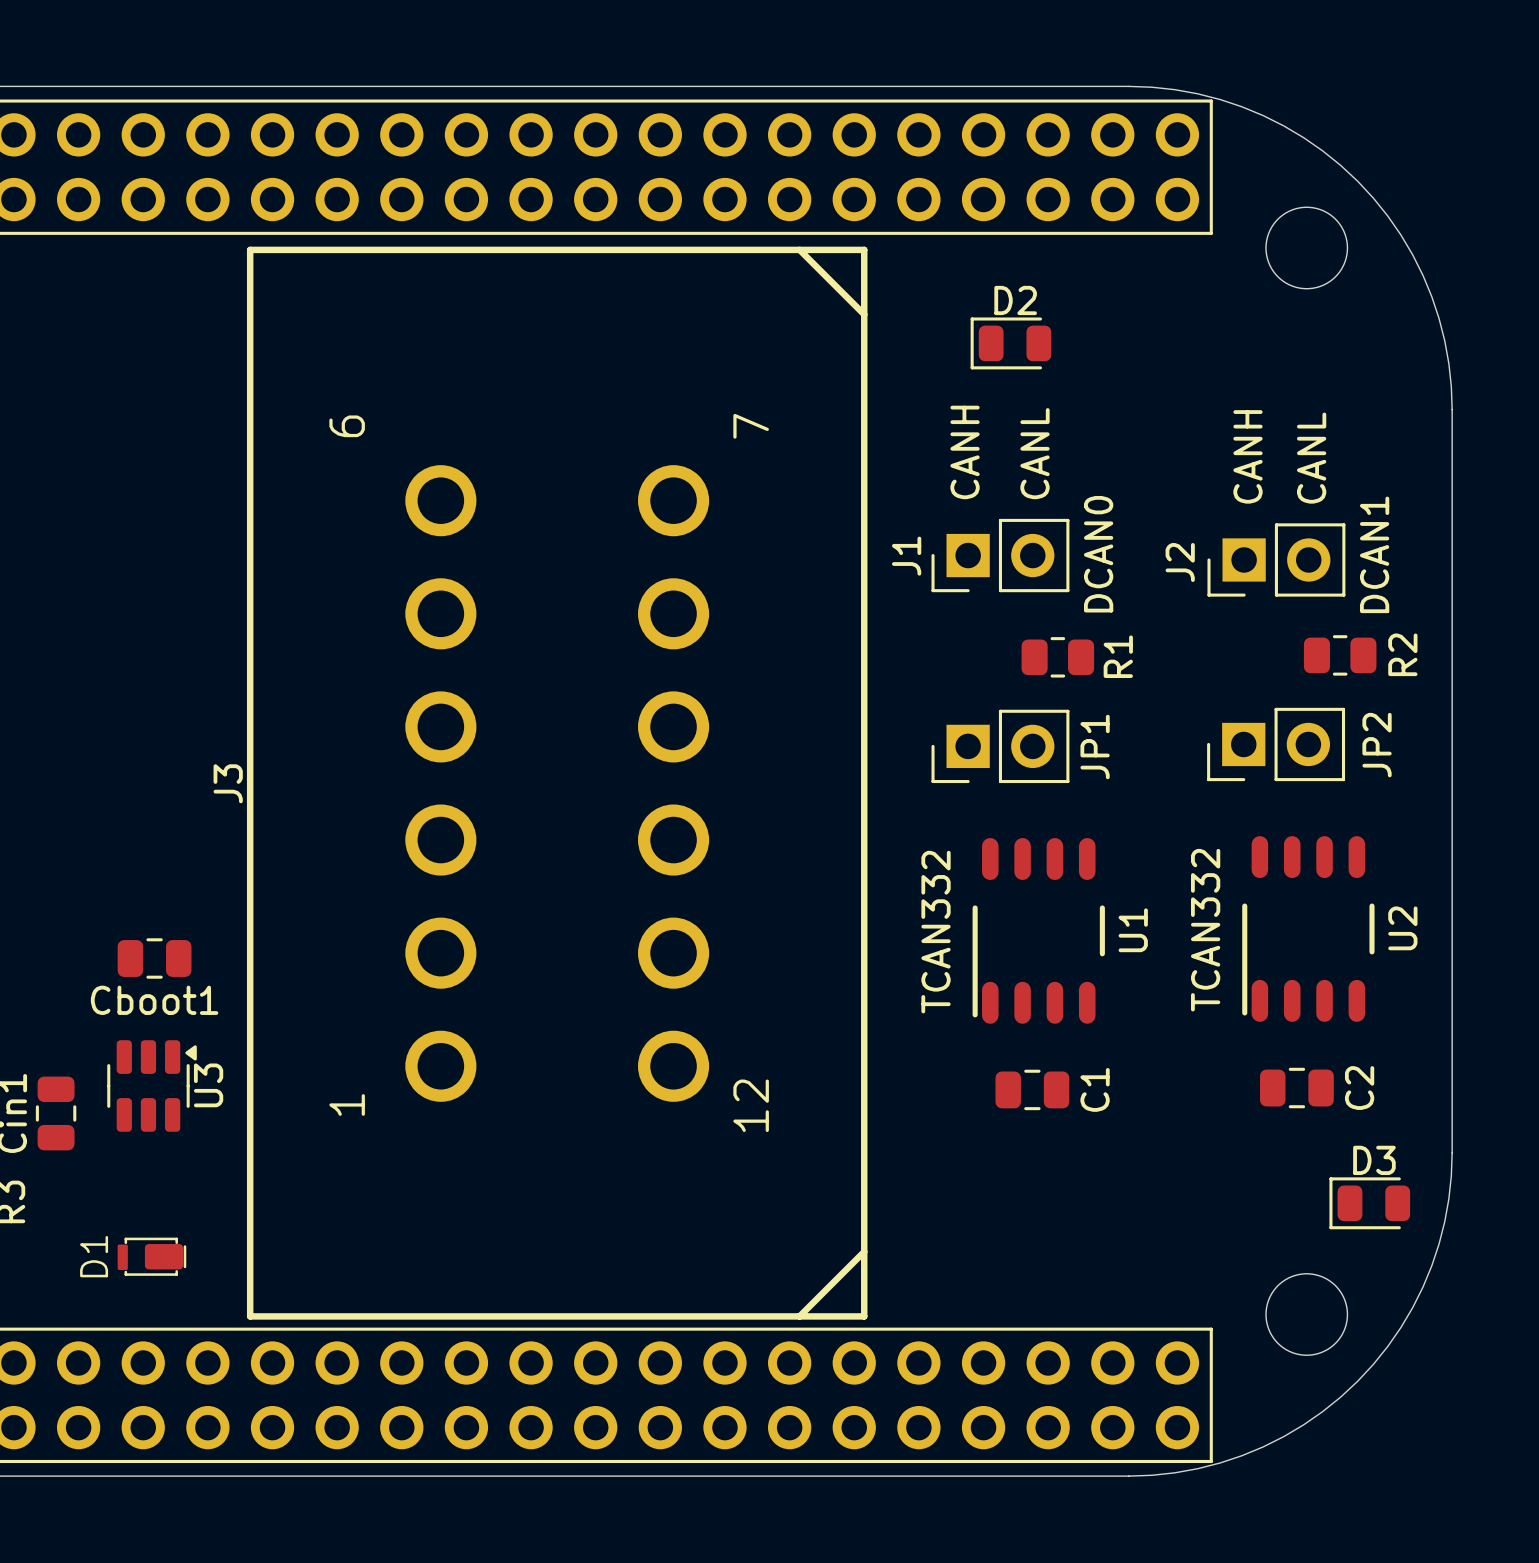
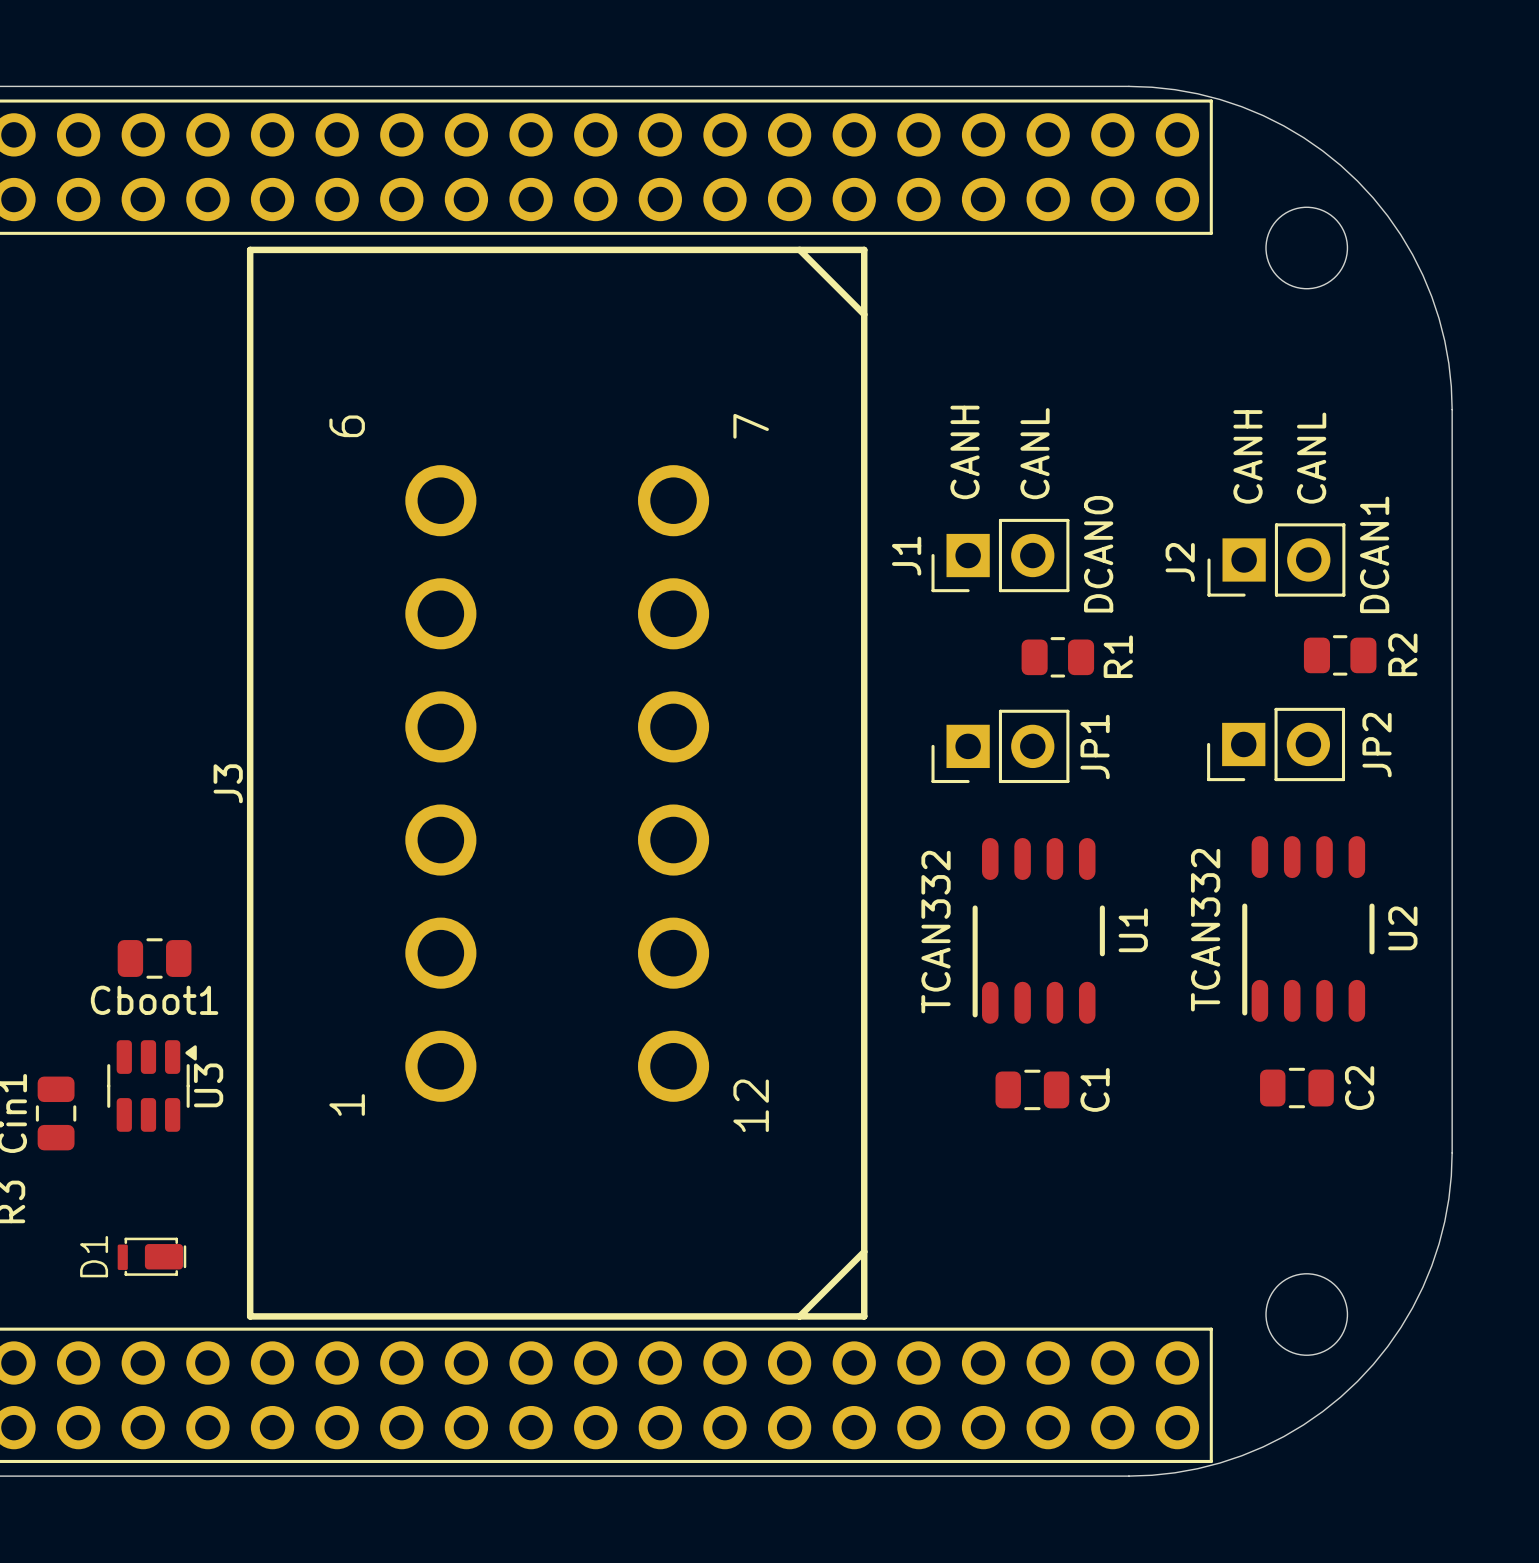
D2: (1010, 343) -> none
D3: (1369, 1203) -> none

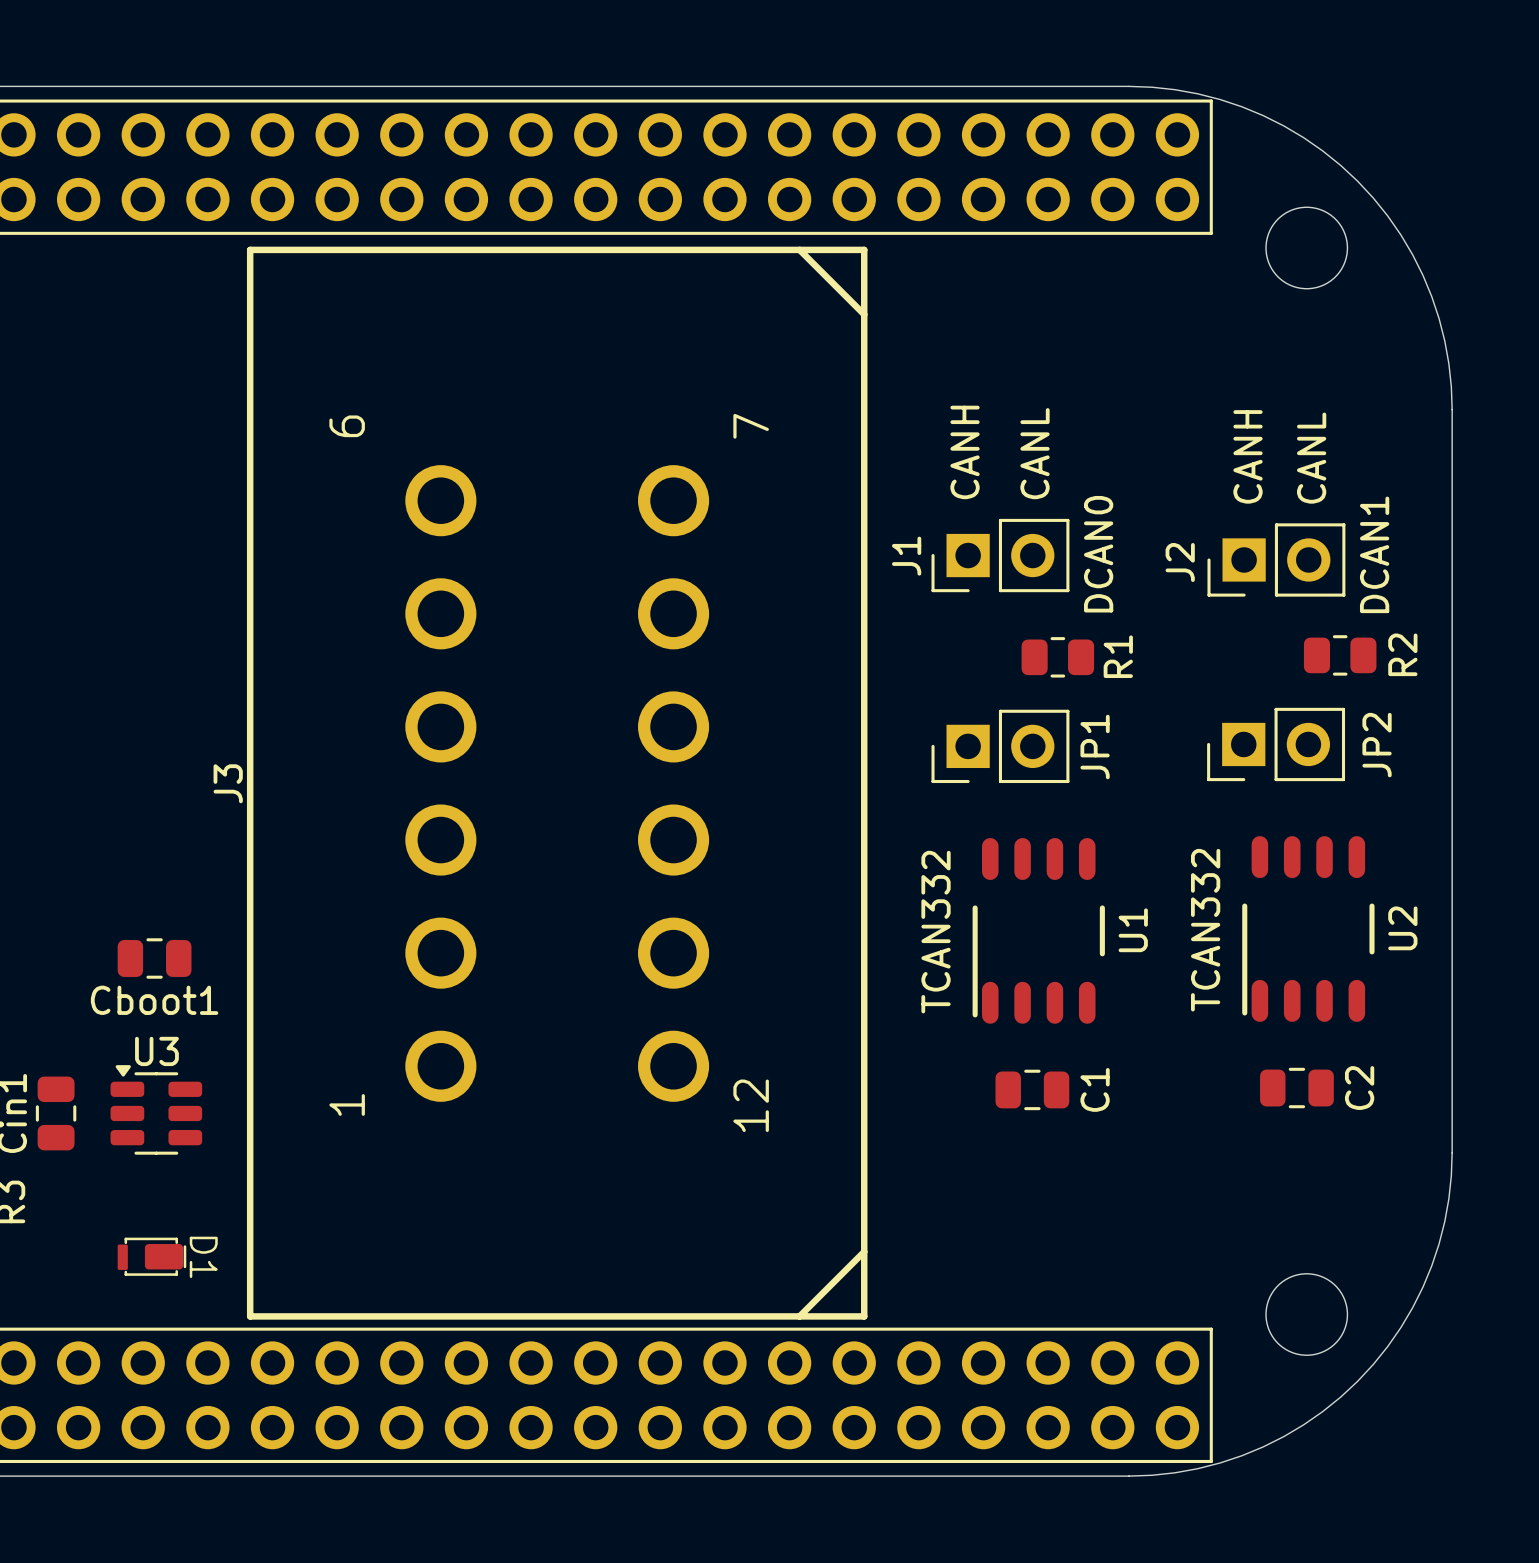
U3 rotation: 0° (152, 1085) -> 90° counterclockwise (156, 1109)
D1 name rotation: 0° (94, 1256) -> 180° (203, 1257)
D1 name position: D1 (94, 1256) -> D1 (203, 1257)

